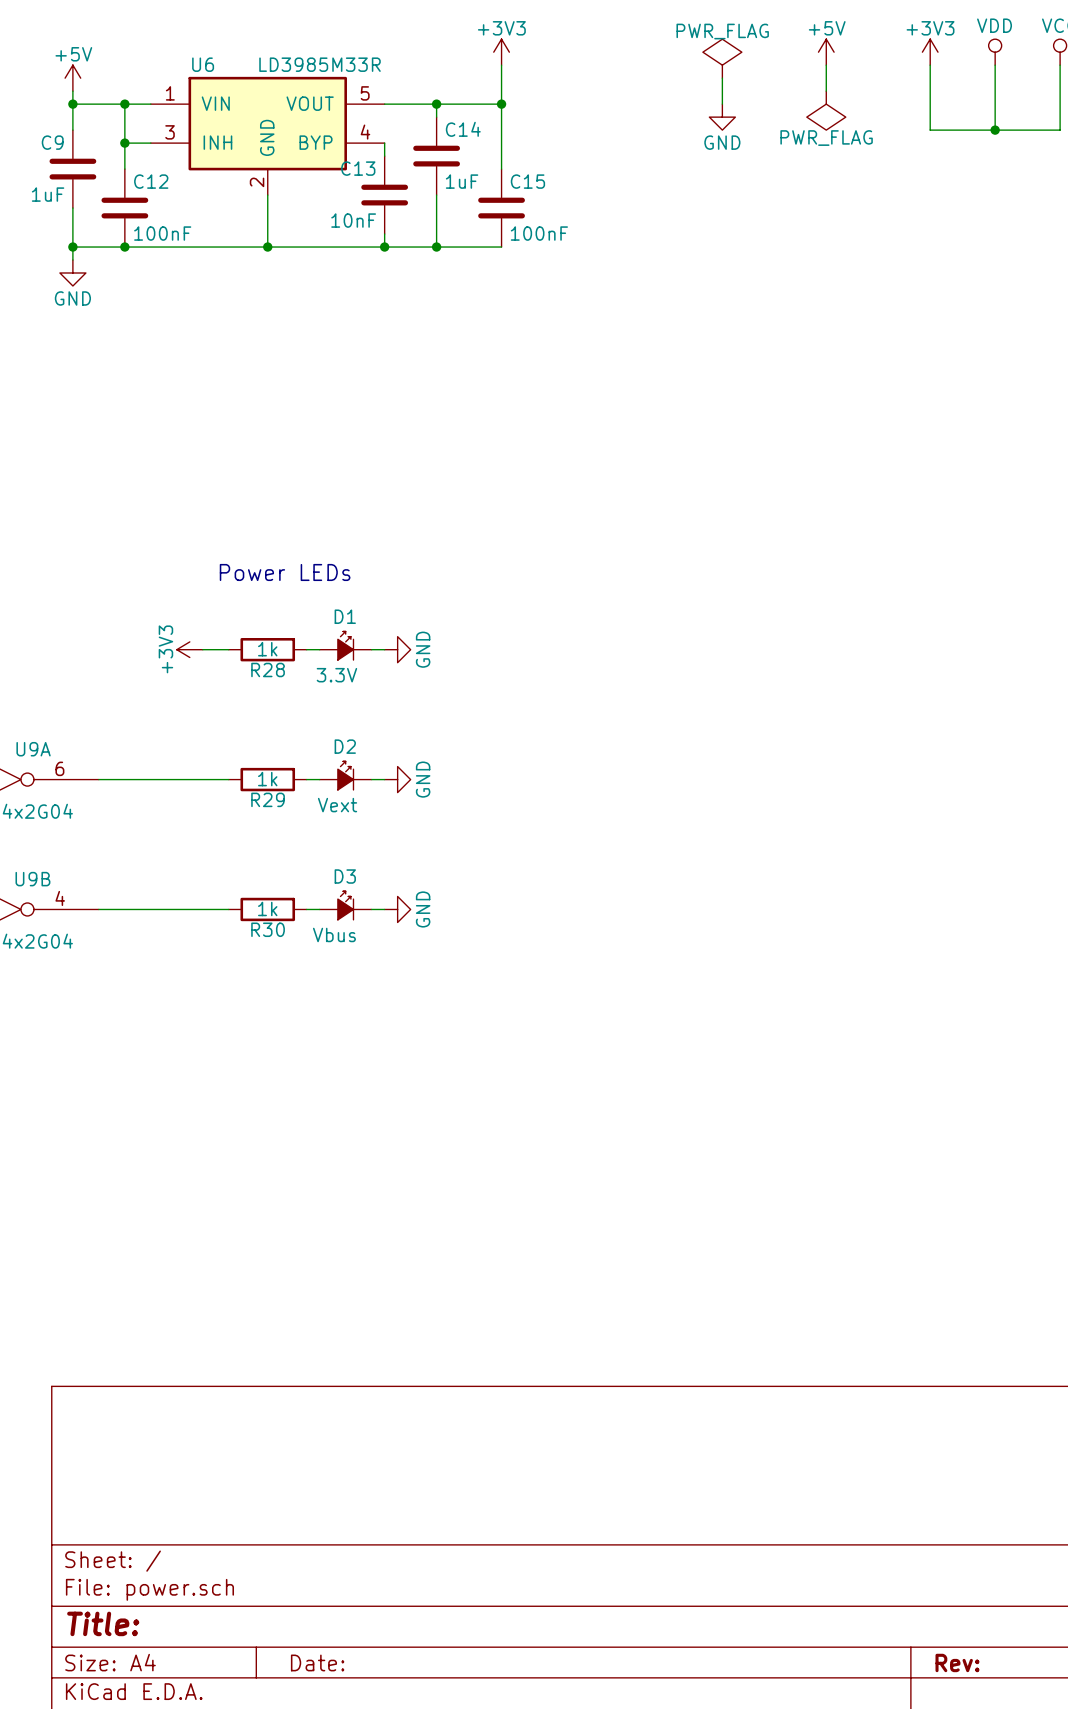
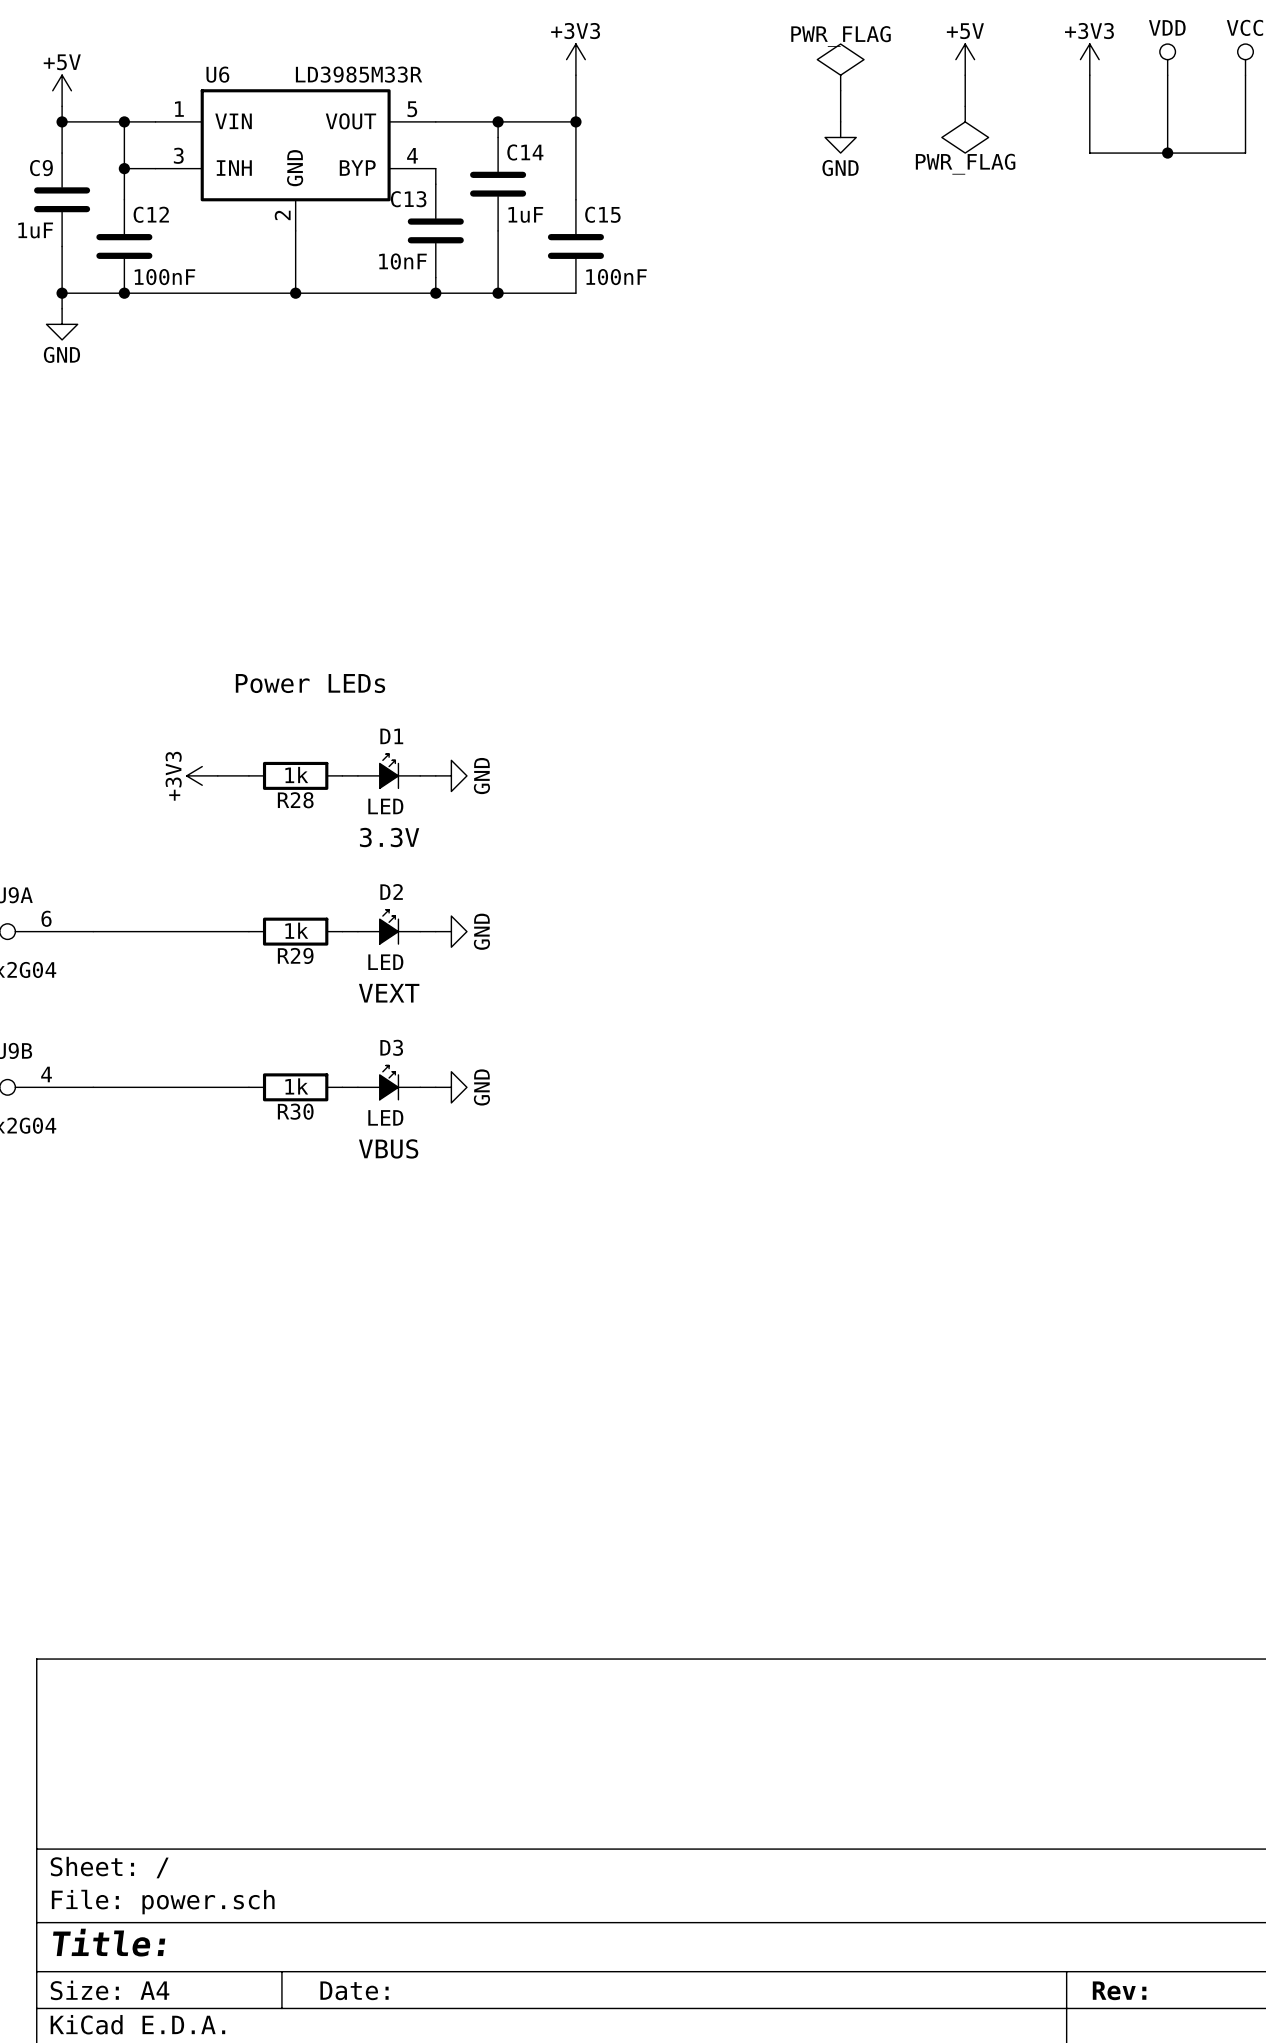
D1 value: 3.3V (336, 675) -> LED (385, 806)
D1 text: none -> 3.3V (389, 837)
D2 value: Vext (337, 805) -> LED (385, 962)
D2 text: none -> VEXT (389, 993)
D3 value: Vbus (334, 934) -> LED (385, 1117)
D3 text: none -> VBUS (388, 1148)

